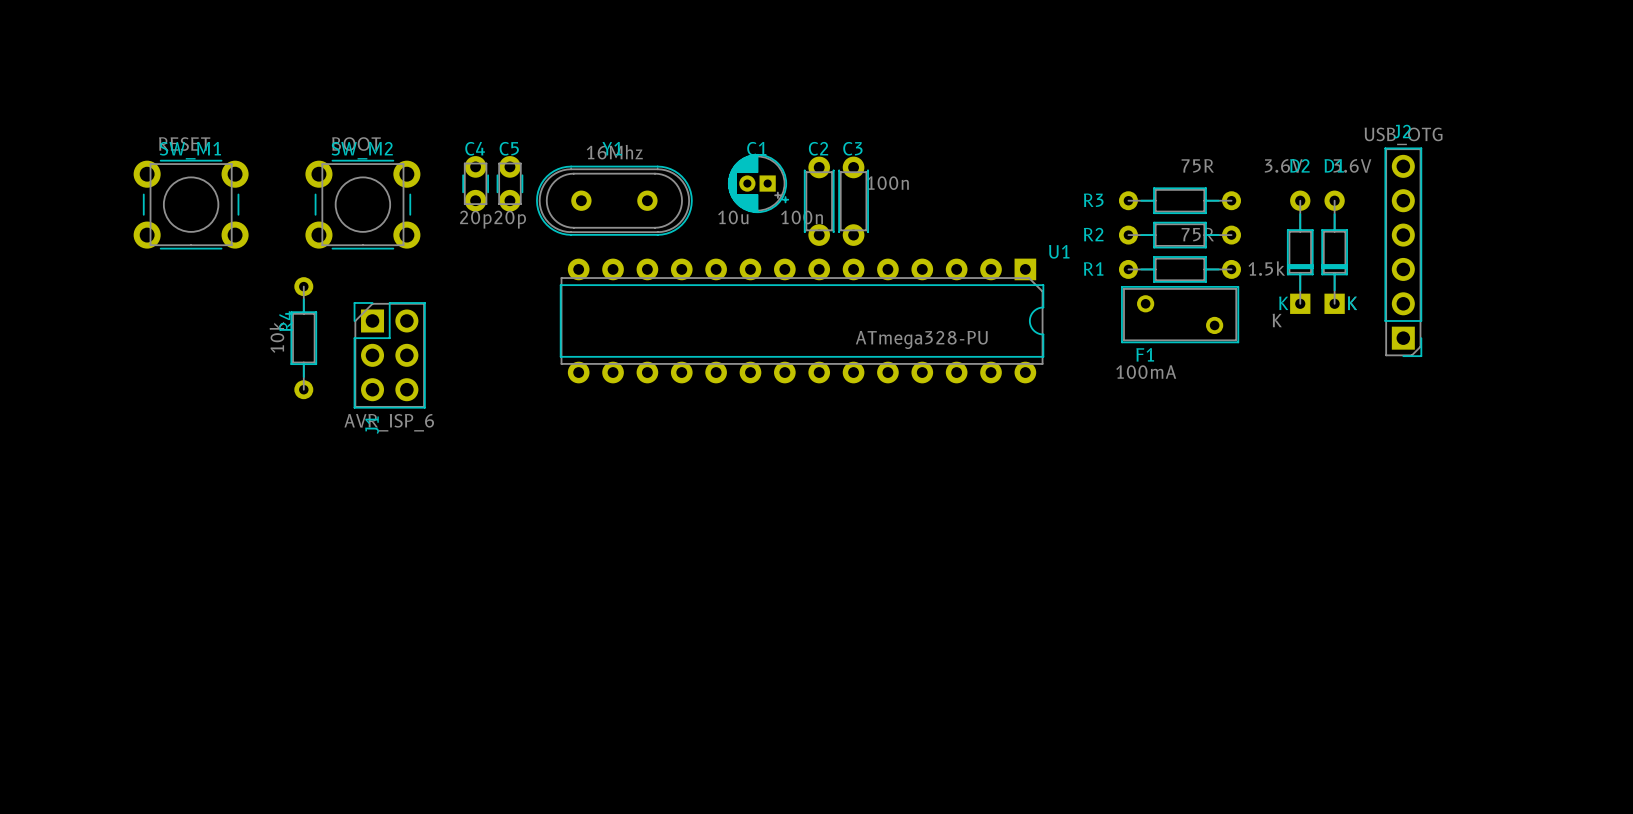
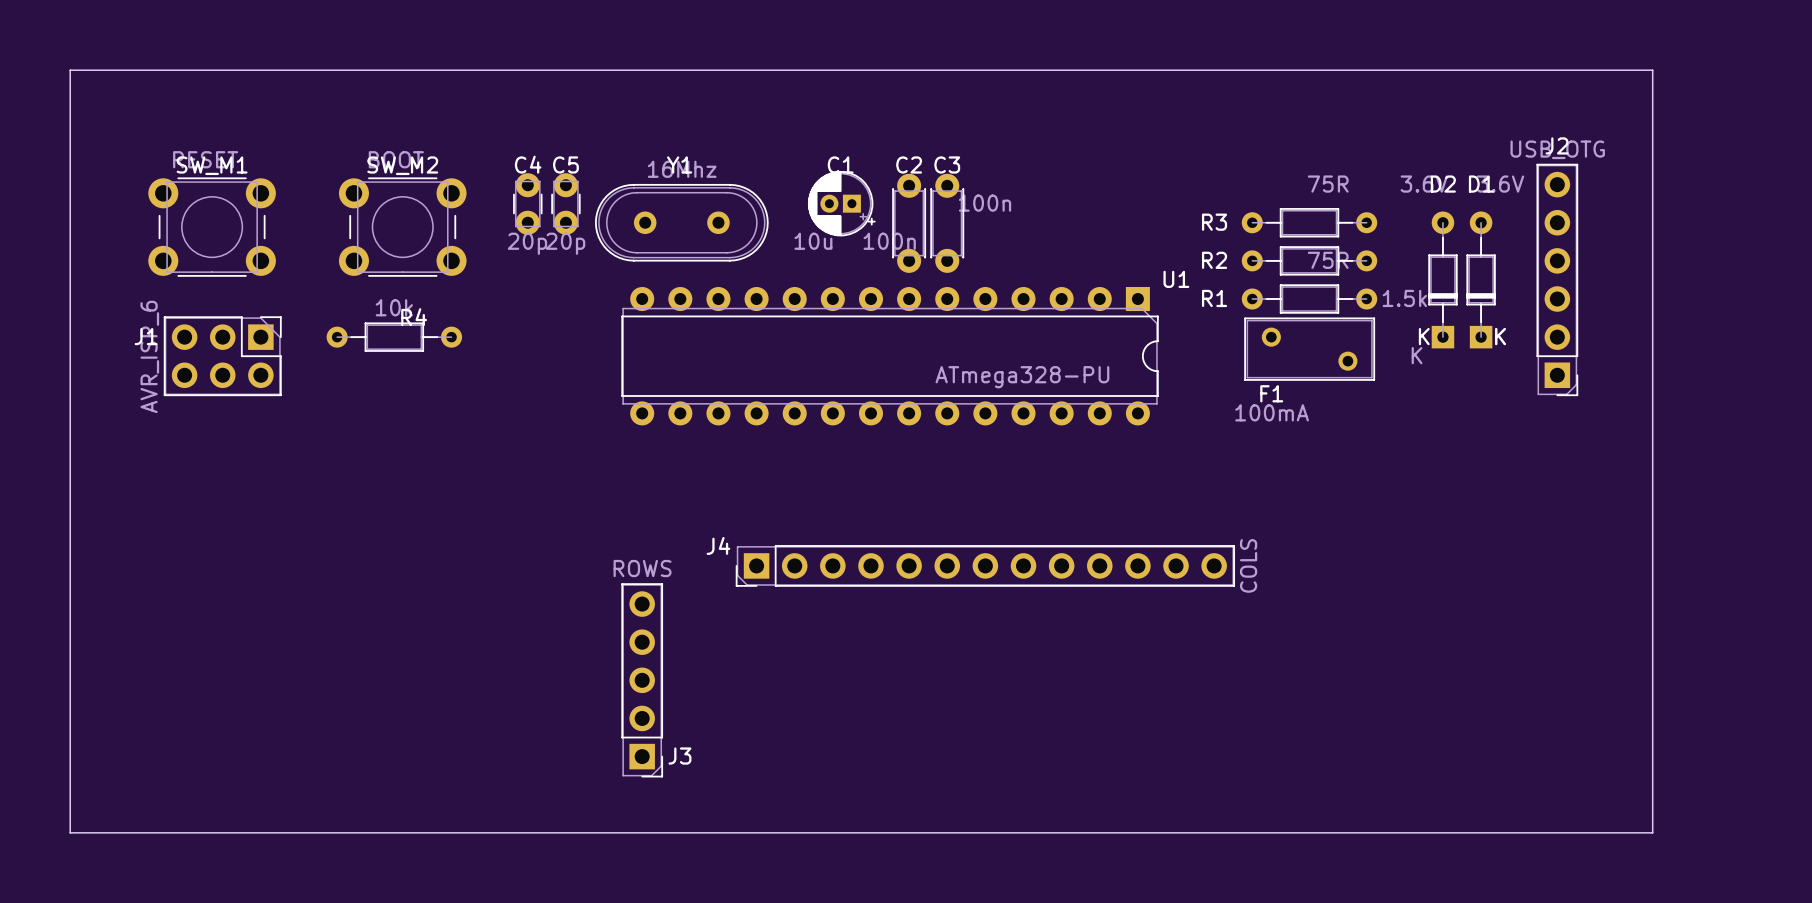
board edge: none -> (70, 70) (1652, 70) (1652, 832) (70, 832) (70, 70)
R4 rotation: 0° (303, 338) -> 90° clockwise (394, 337)
J1 rotation: 0° (389, 355) -> 90° clockwise (222, 356)
J1 position: (389, 355) -> (222, 356)
J4: none -> COLS (985, 565)
J3: none -> ROWS (642, 680)

